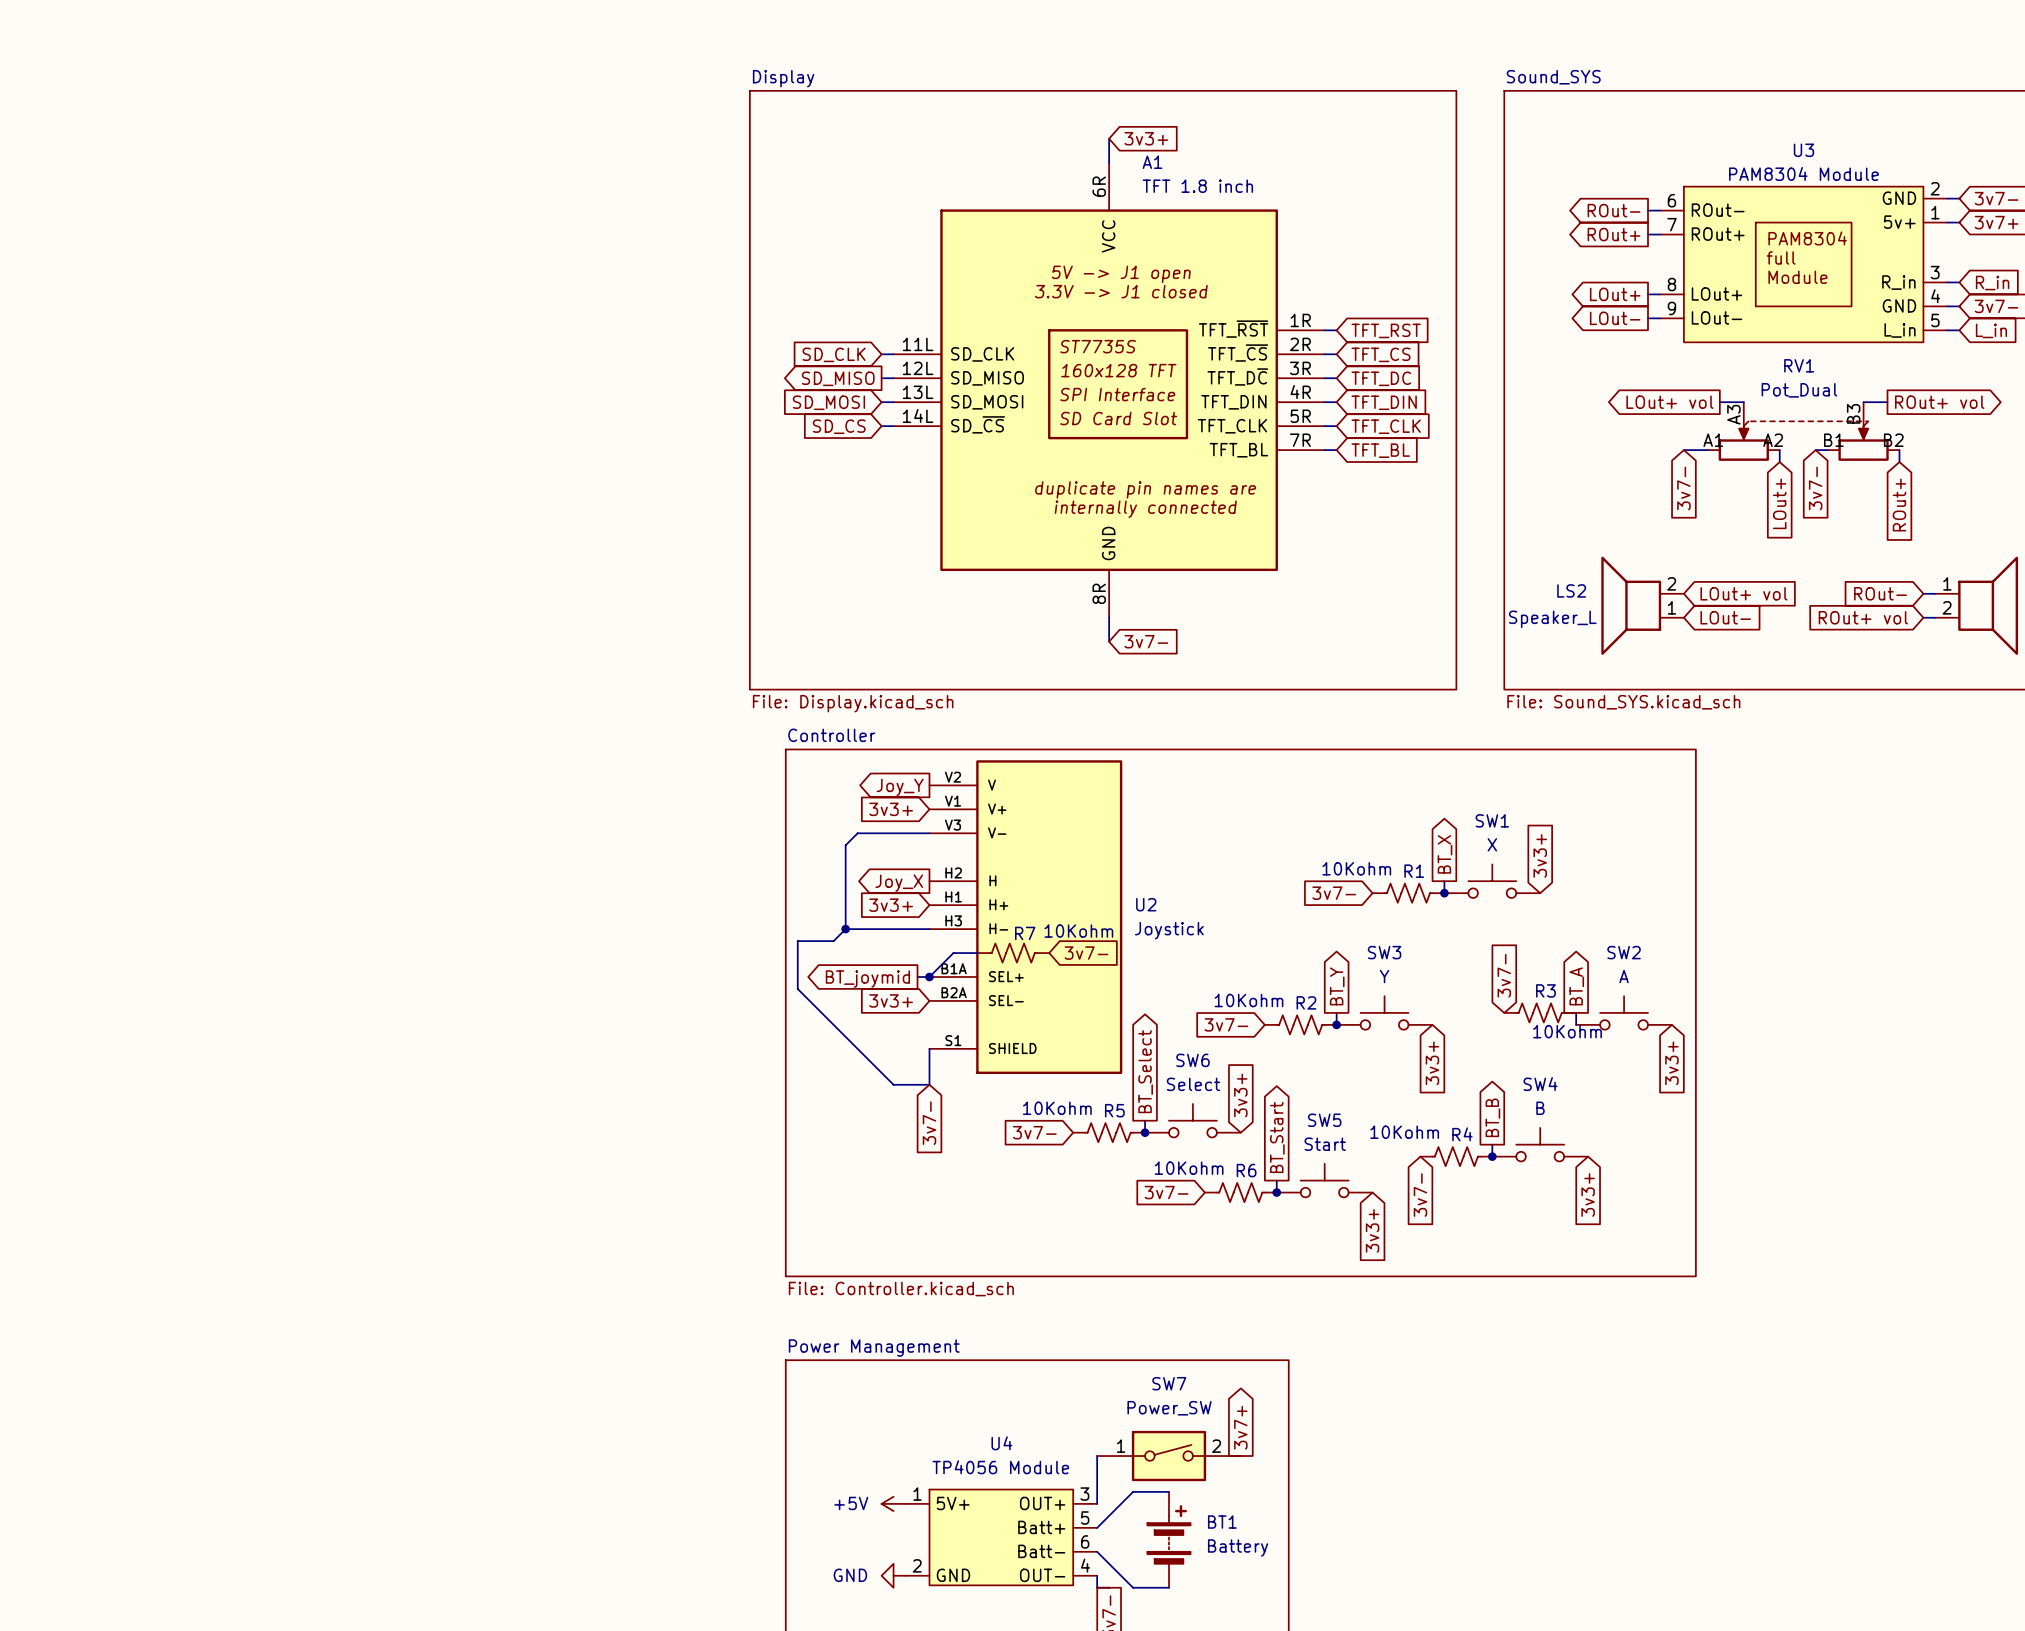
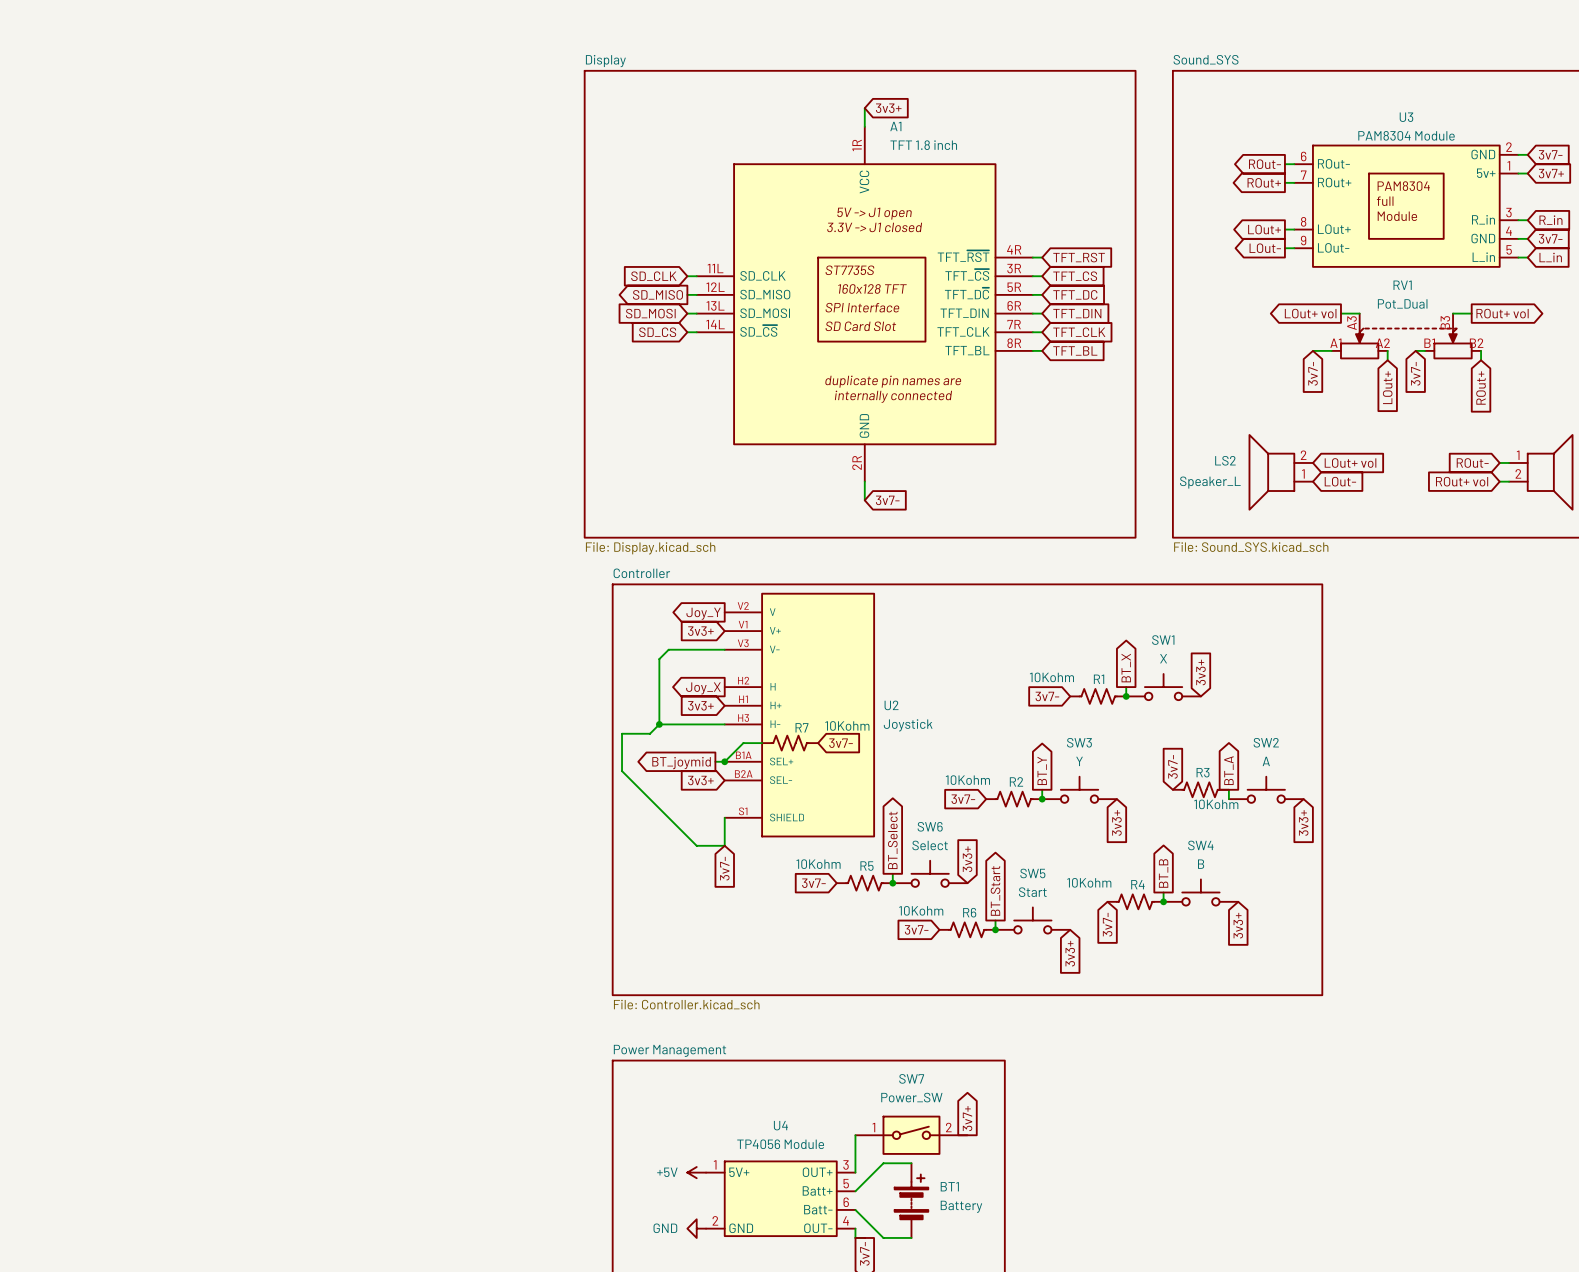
A1 pin number: 6R (1099, 186) -> 1R (857, 145)
A1 pin number: 1R (1300, 320) -> 4R (1014, 249)
A1 pin number: 2R (1300, 344) -> 3R (1014, 268)
A1 pin number: 3R (1300, 368) -> 5R (1014, 287)
A1 pin number: 4R (1300, 392) -> 6R (1014, 305)
A1 pin number: 5R (1300, 416) -> 7R (1014, 324)
A1 pin number: 7R (1300, 440) -> 8R (1014, 343)
A1 pin number: 8R (1099, 593) -> 2R (857, 462)

